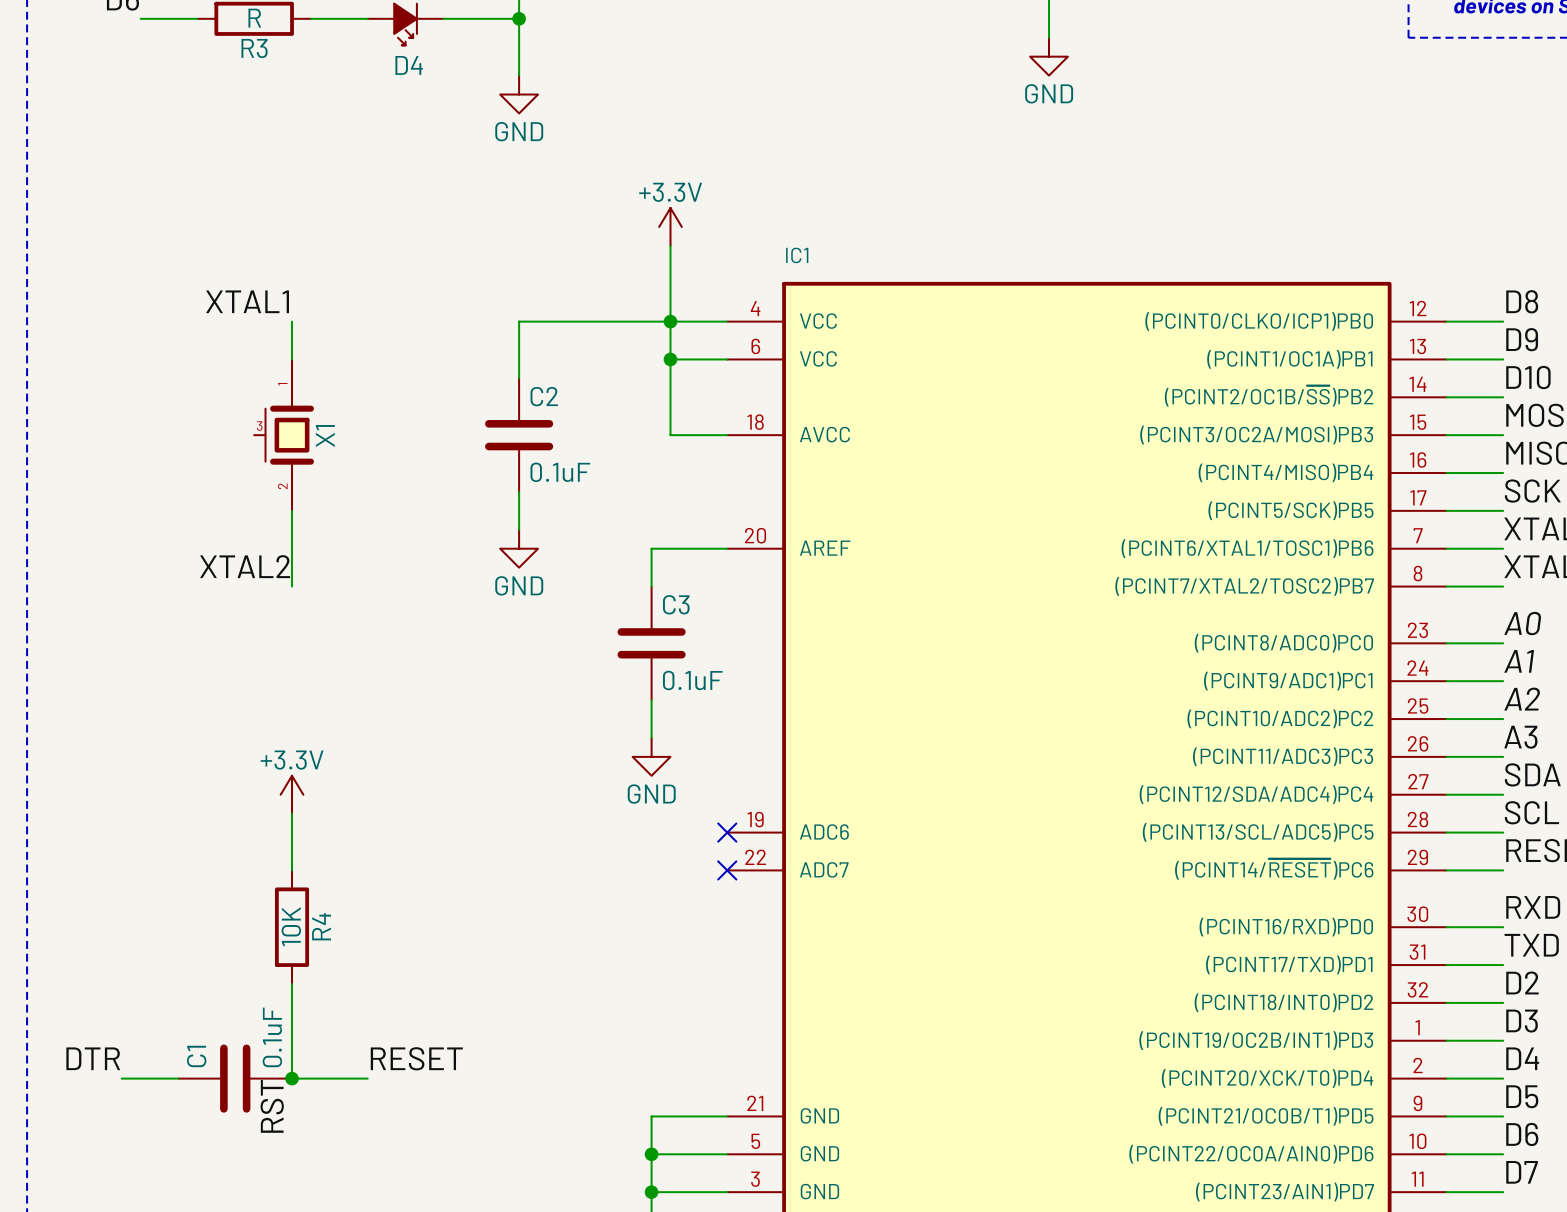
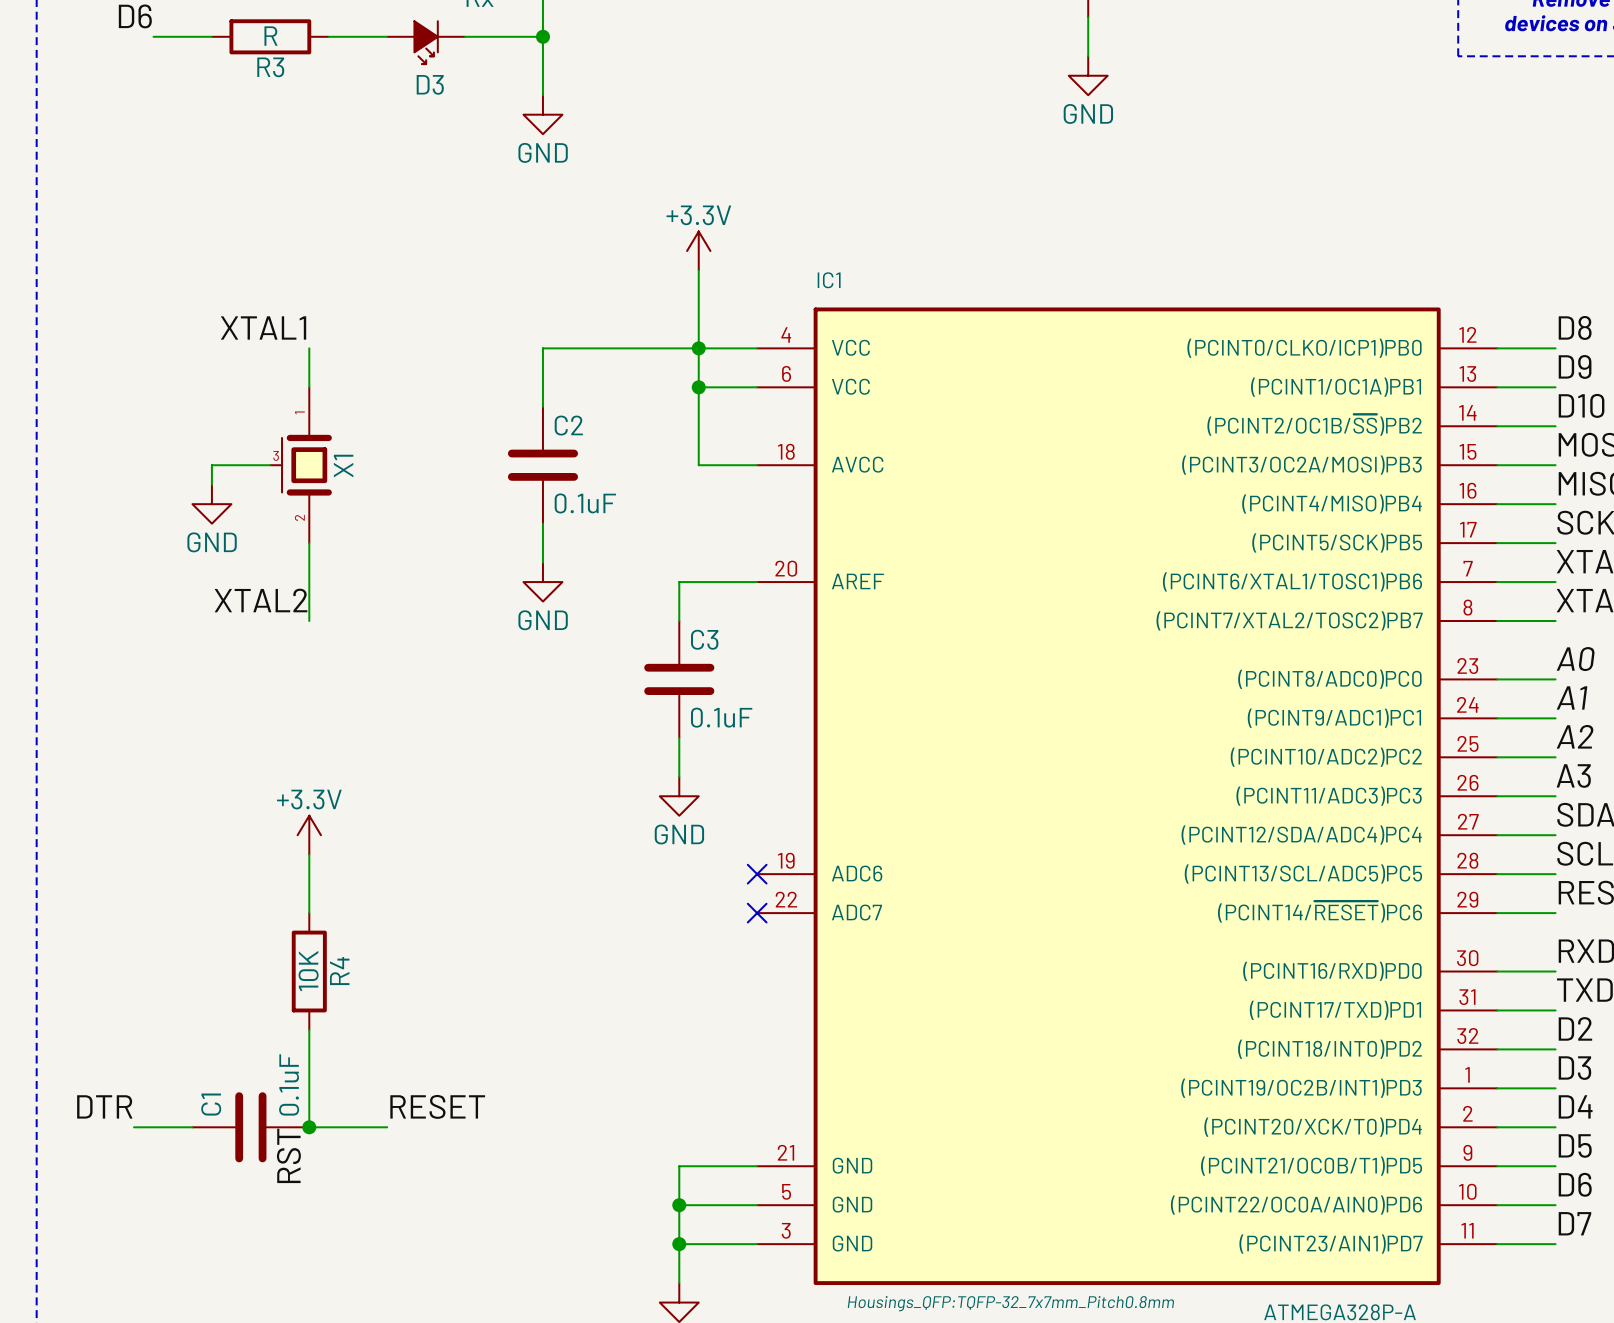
D4 name: D4 (409, 65) -> D3 (430, 84)
wire: none -> (270, 465) (211, 465) (211, 484)
power symbol: none -> GND (211, 504)

